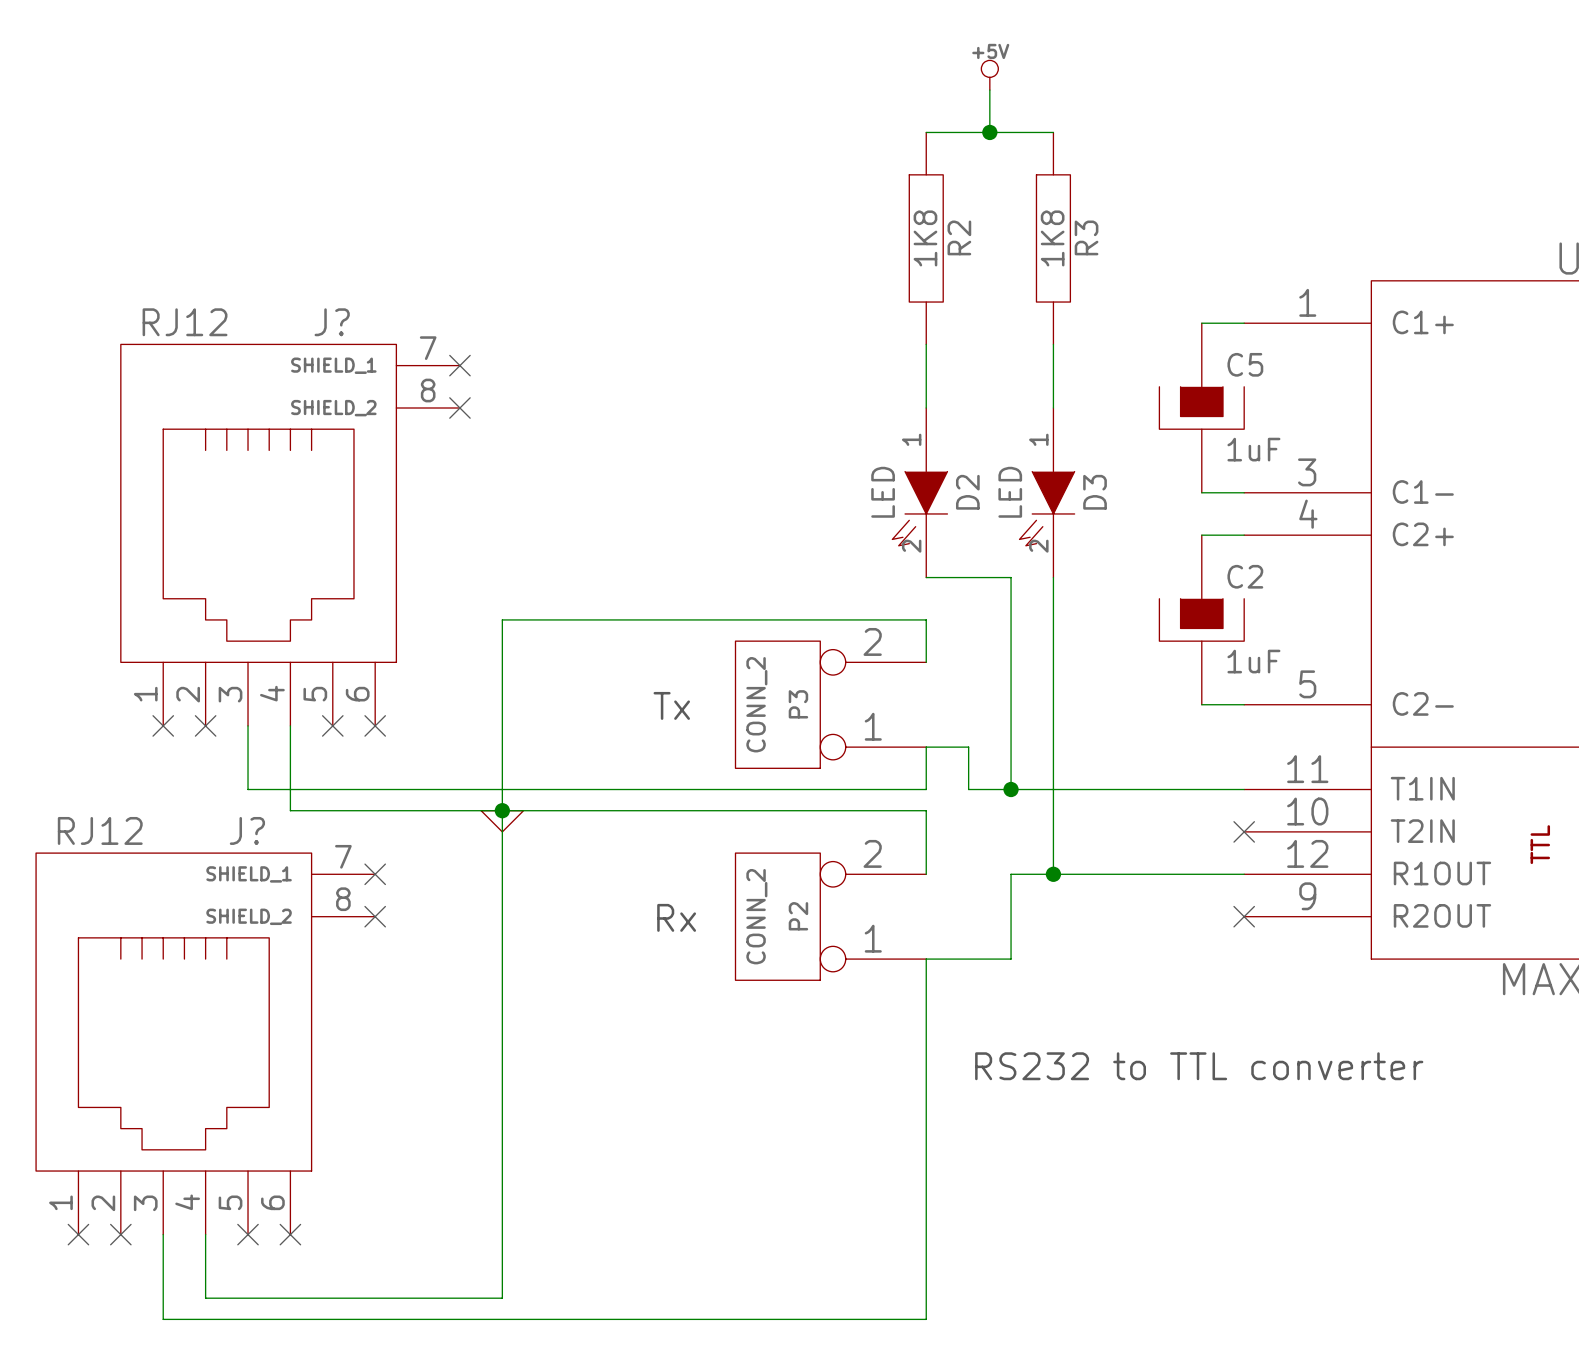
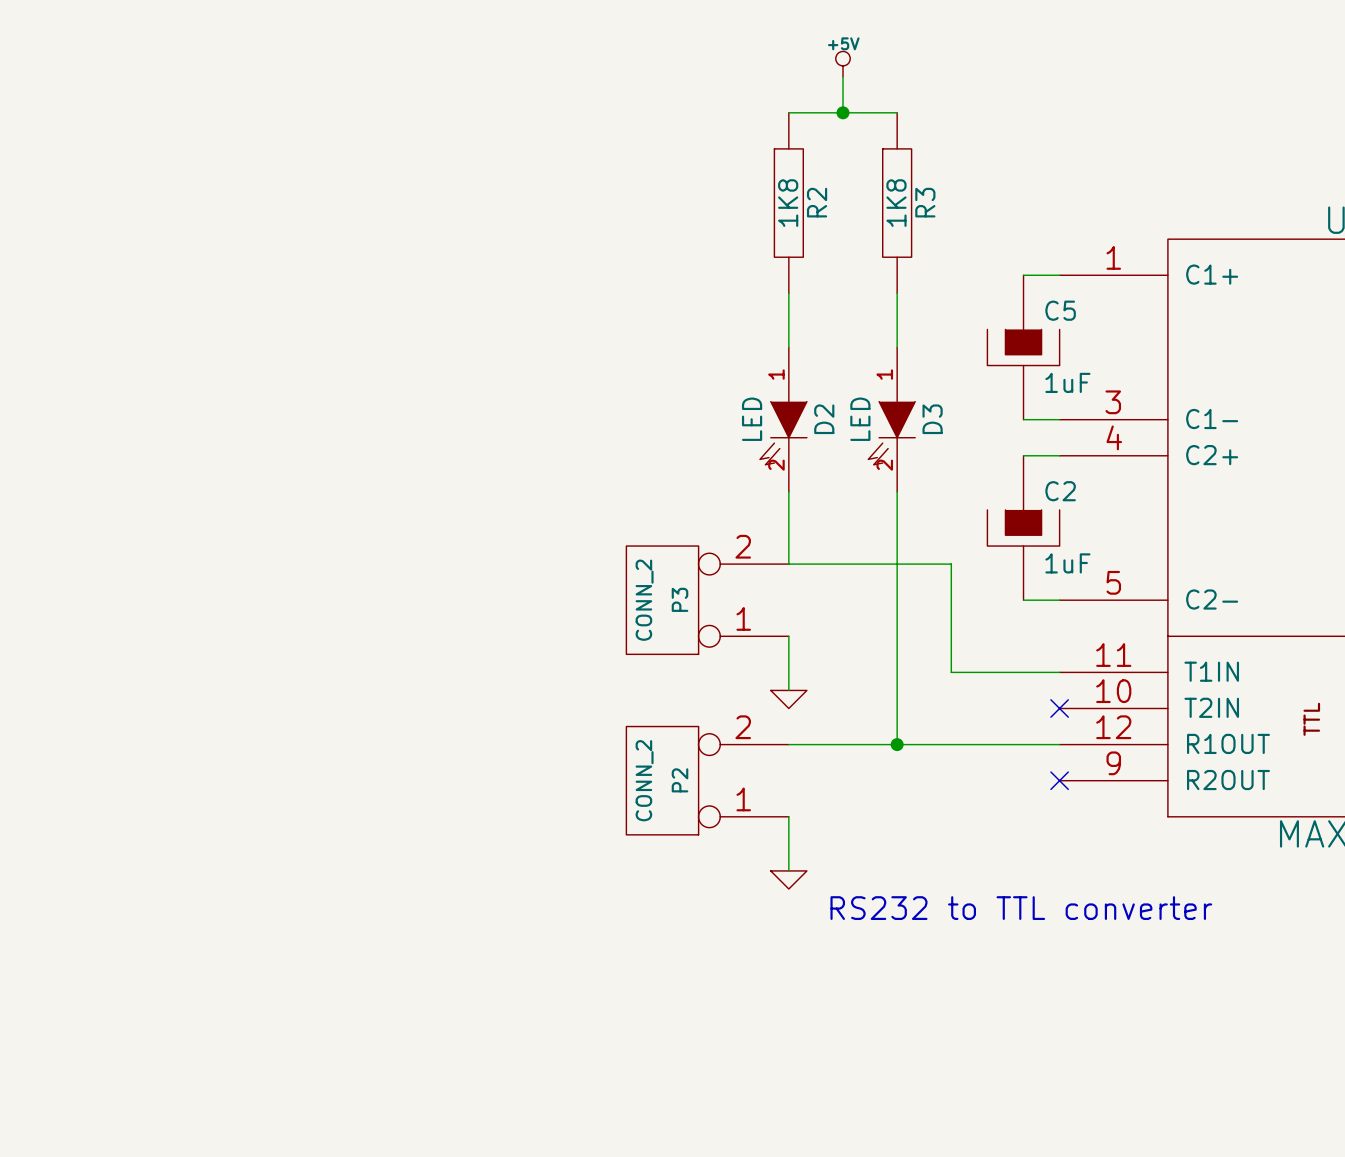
no-connect mark: (459, 365) -> none
no-connect mark: (459, 408) -> none
J?: RJ12 (290, 535) -> none
wire: (926, 577) (1011, 577) (1011, 789) -> (788, 491) (788, 527)
wire: (926, 619) (502, 619) (502, 1298) (205, 1298) (205, 1234) -> none
text: Tx (671, 705) -> none
no-connect mark: (163, 725) -> none
no-connect mark: (205, 725) -> none
wire: (248, 725) (248, 789) (926, 789) -> (788, 690) (788, 672)
wire: (290, 725) (290, 810) (926, 810) (926, 874) -> none
no-connect mark: (332, 725) -> none
no-connect mark: (375, 725) -> none
wire: (926, 747) (968, 747) (968, 789) (1117, 789) -> (788, 564) (951, 564) (951, 672)
junction: (1011, 789) -> none
junction: (502, 810) -> none
power symbol: (502, 821) -> none
power symbol: none -> (788, 699)
no-connect mark: (375, 874) -> none
wire: (1011, 874) (1011, 959) (926, 959) -> (861, 744) (788, 744)
no-connect mark: (375, 916) -> none
text: Rx (676, 917) -> none
wire: (926, 1022) (926, 1319) (163, 1319) (163, 1234) -> none
power symbol: none -> (788, 879)
J?: RJ12 (205, 1043) -> none
no-connect mark: (78, 1234) -> none
no-connect mark: (120, 1234) -> none
no-connect mark: (248, 1234) -> none
no-connect mark: (290, 1234) -> none

